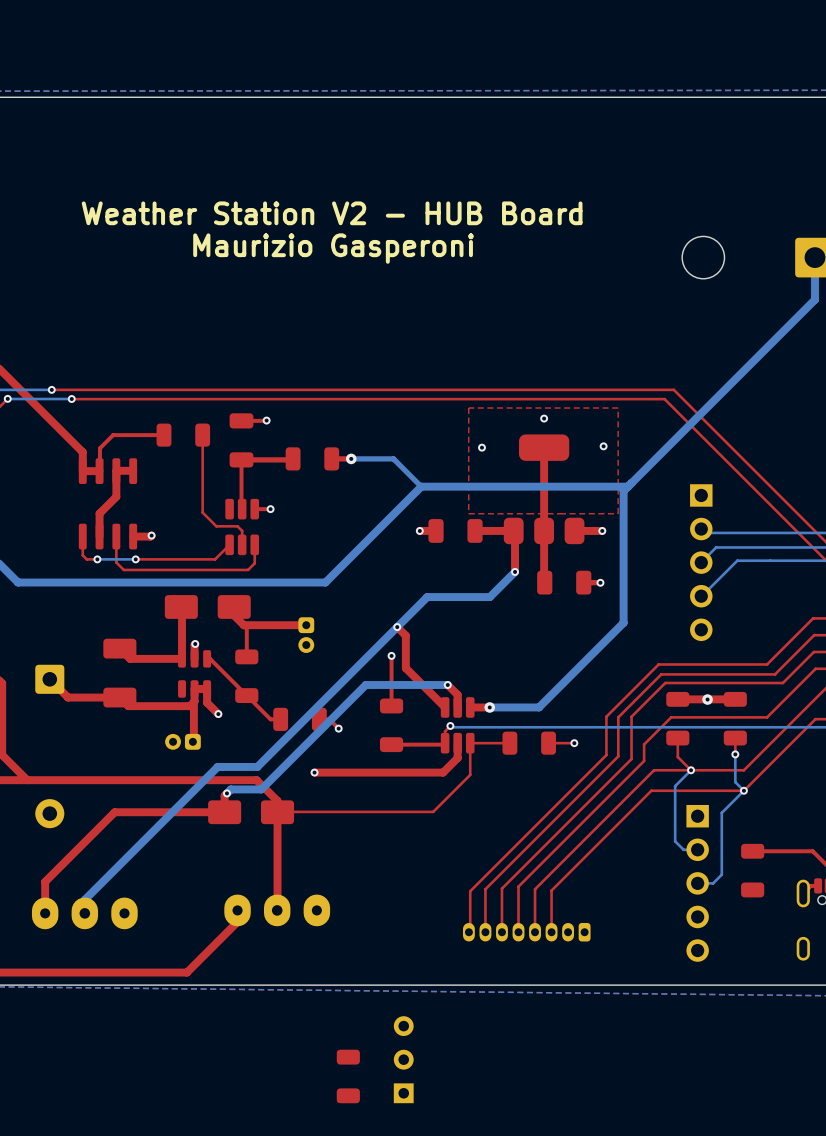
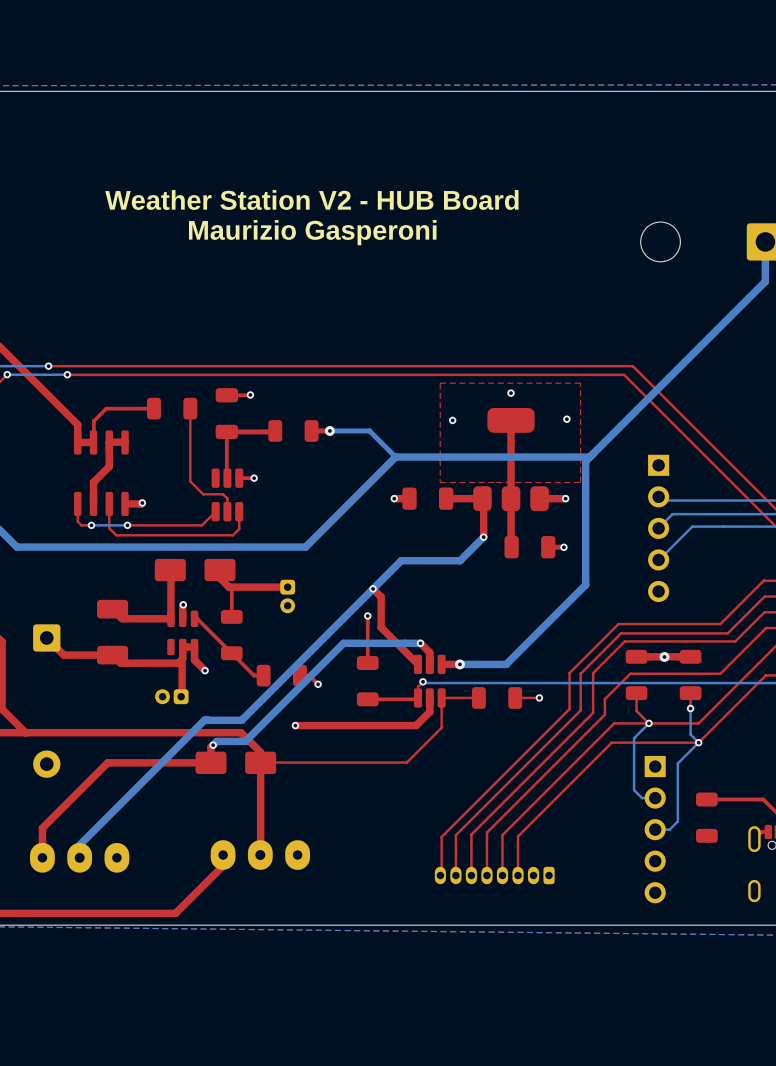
part: (403, 1059) -> none
part: (348, 1076) -> none

